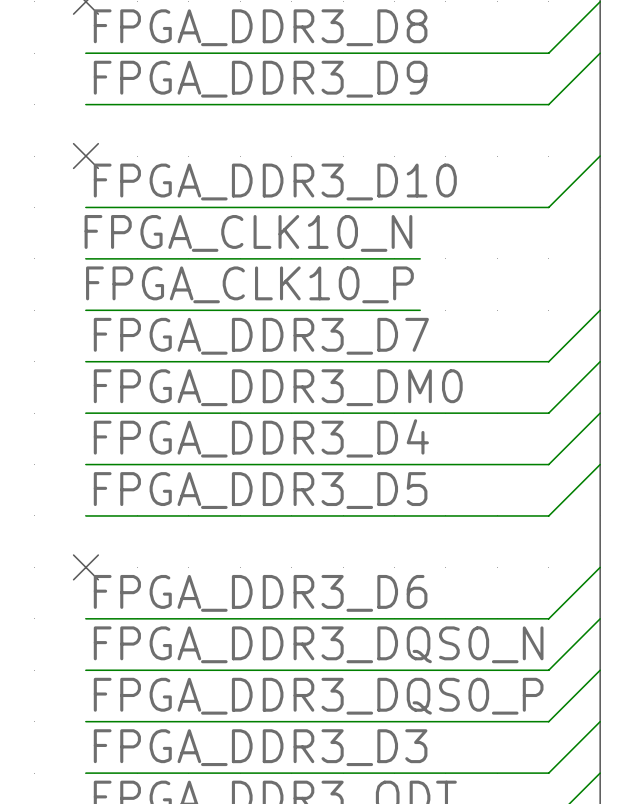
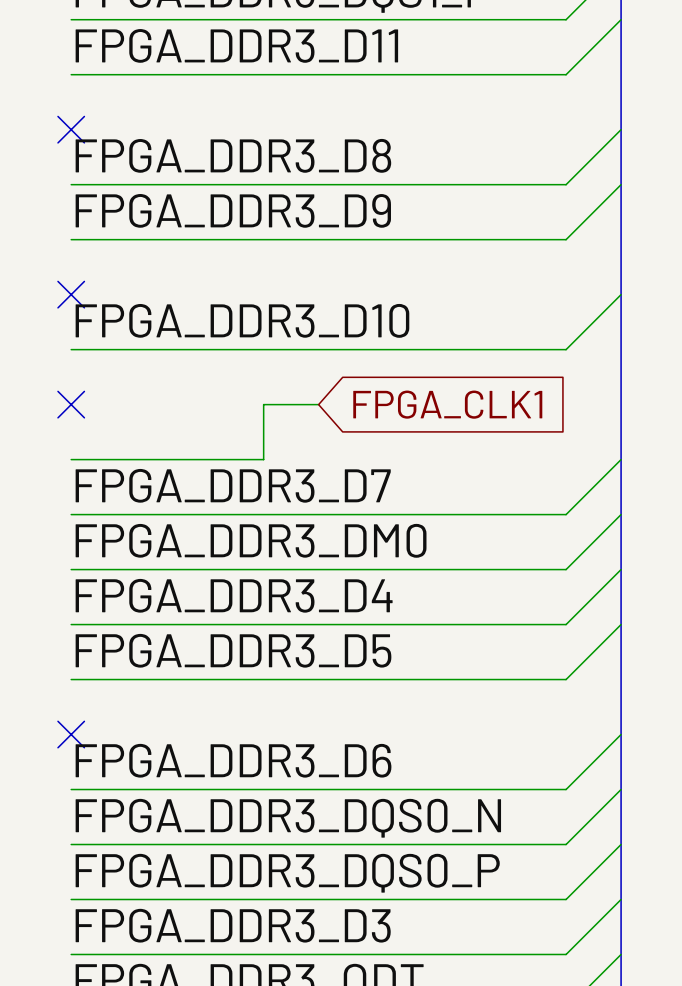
label: FPGA_CLK10_N (248, 233) -> none
wire: (85, 258) (265, 258) -> none
no-connect mark: none -> (71, 404)
wire: (317, 258) (420, 258) -> none
global label: none -> FPGA_CLK1 (447, 404)
label: FPGA_CLK10_P (249, 284) -> none
wire: (265, 310) (420, 310) -> (263, 459) (263, 404)

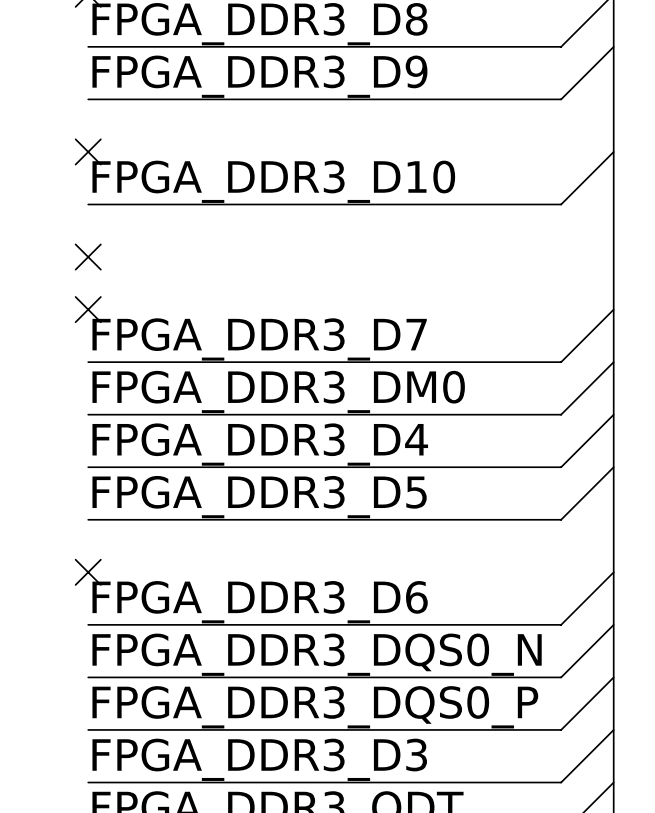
wire: (318, 404) (263, 404) (263, 459) (71, 459) -> none
global label: FPGA_CLK1 (447, 404) -> none
no-connect mark: none -> (88, 309)

